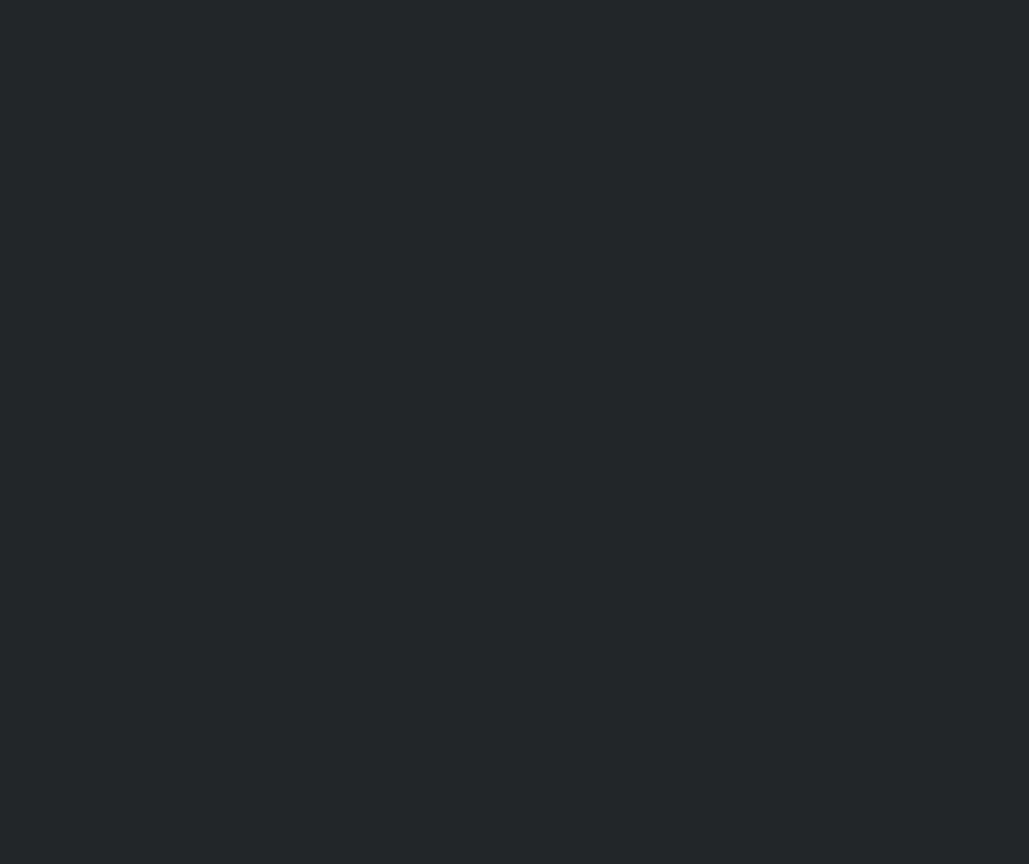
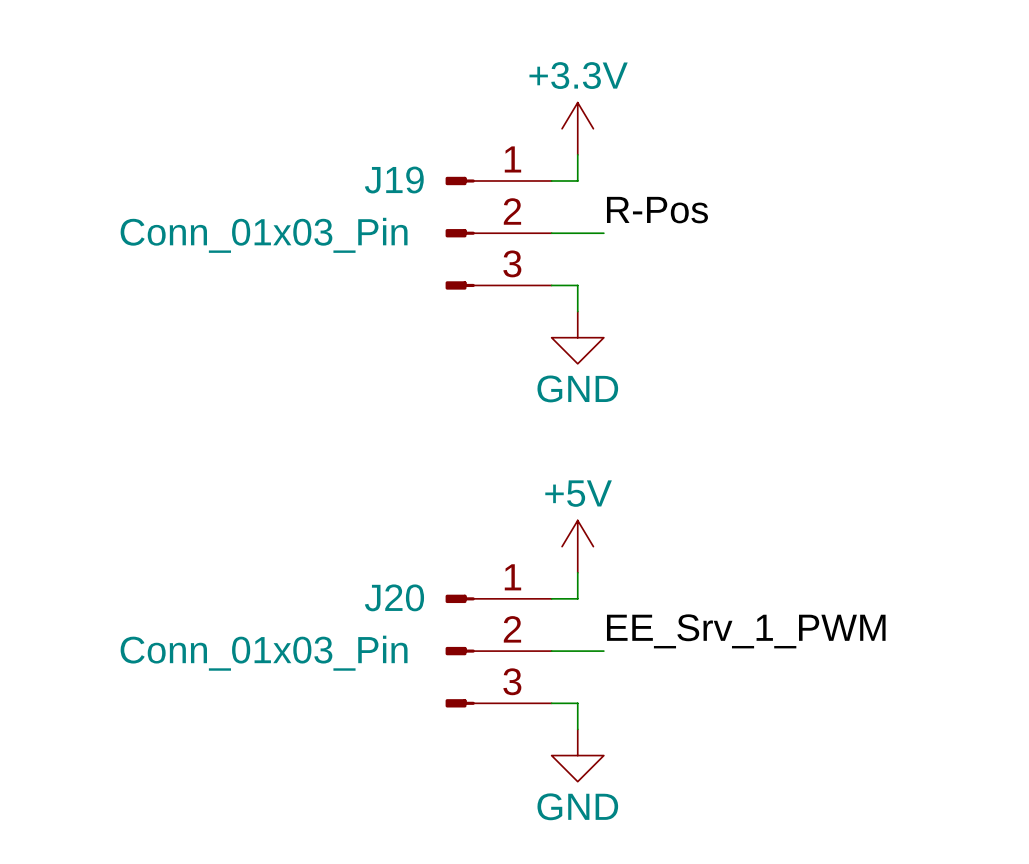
power symbol: none -> +3.3V (577, 128)
wire: none -> (577, 154) (577, 180) (551, 180)
label: none -> R-Pos (657, 210)
J19: none -> Conn_01x03_Pin (498, 233)
wire: none -> (551, 233) (603, 233)
wire: none -> (551, 285) (577, 285) (577, 311)
power symbol: none -> GND (577, 337)
power symbol: none -> +5V (577, 546)
wire: none -> (577, 572) (577, 598) (551, 598)
label: none -> EE_Srv_1_PWM (746, 631)
J20: none -> Conn_01x03_Pin (498, 651)
wire: none -> (551, 651) (603, 651)
wire: none -> (551, 703) (577, 703) (577, 729)
power symbol: none -> GND (577, 755)

